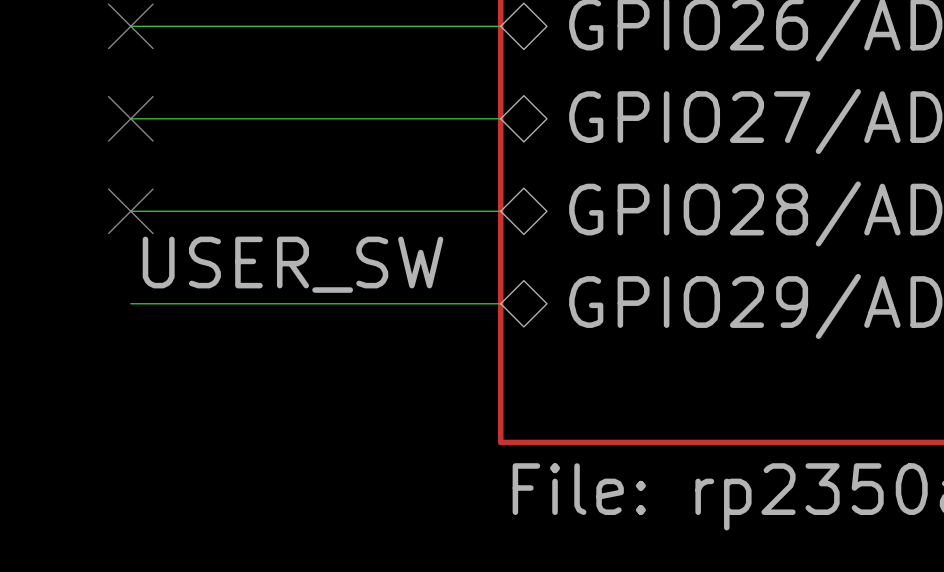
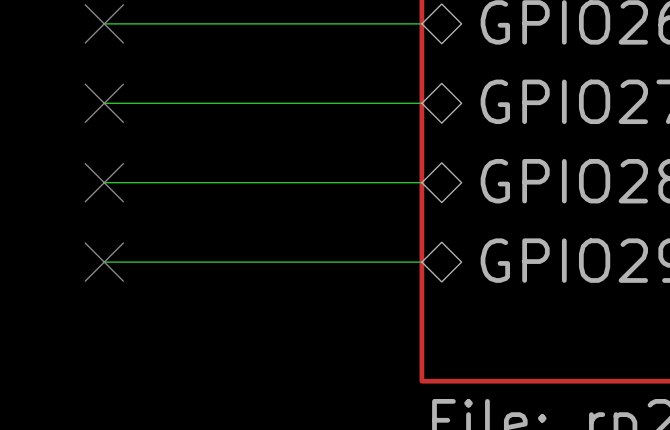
label: USER_SW (293, 264) -> none
no-connect mark: none -> (104, 262)

